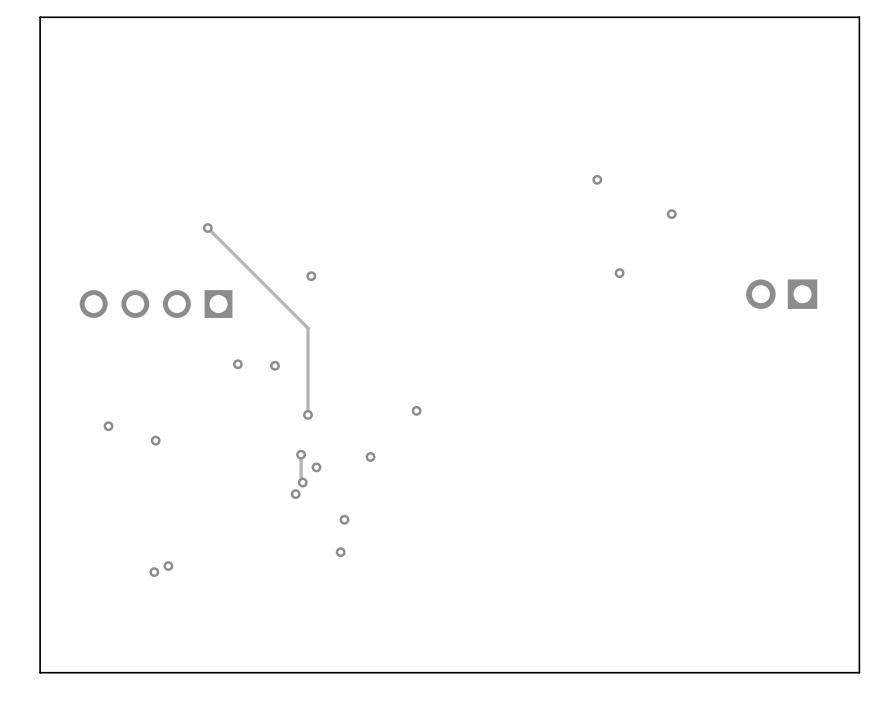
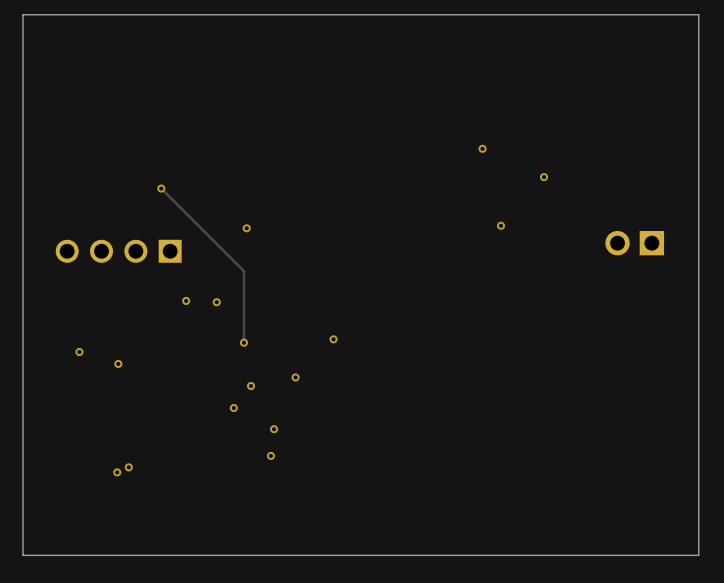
track: (301, 454) (301, 480) -> none
via: (301, 454) -> none
via: (302, 482) -> none

